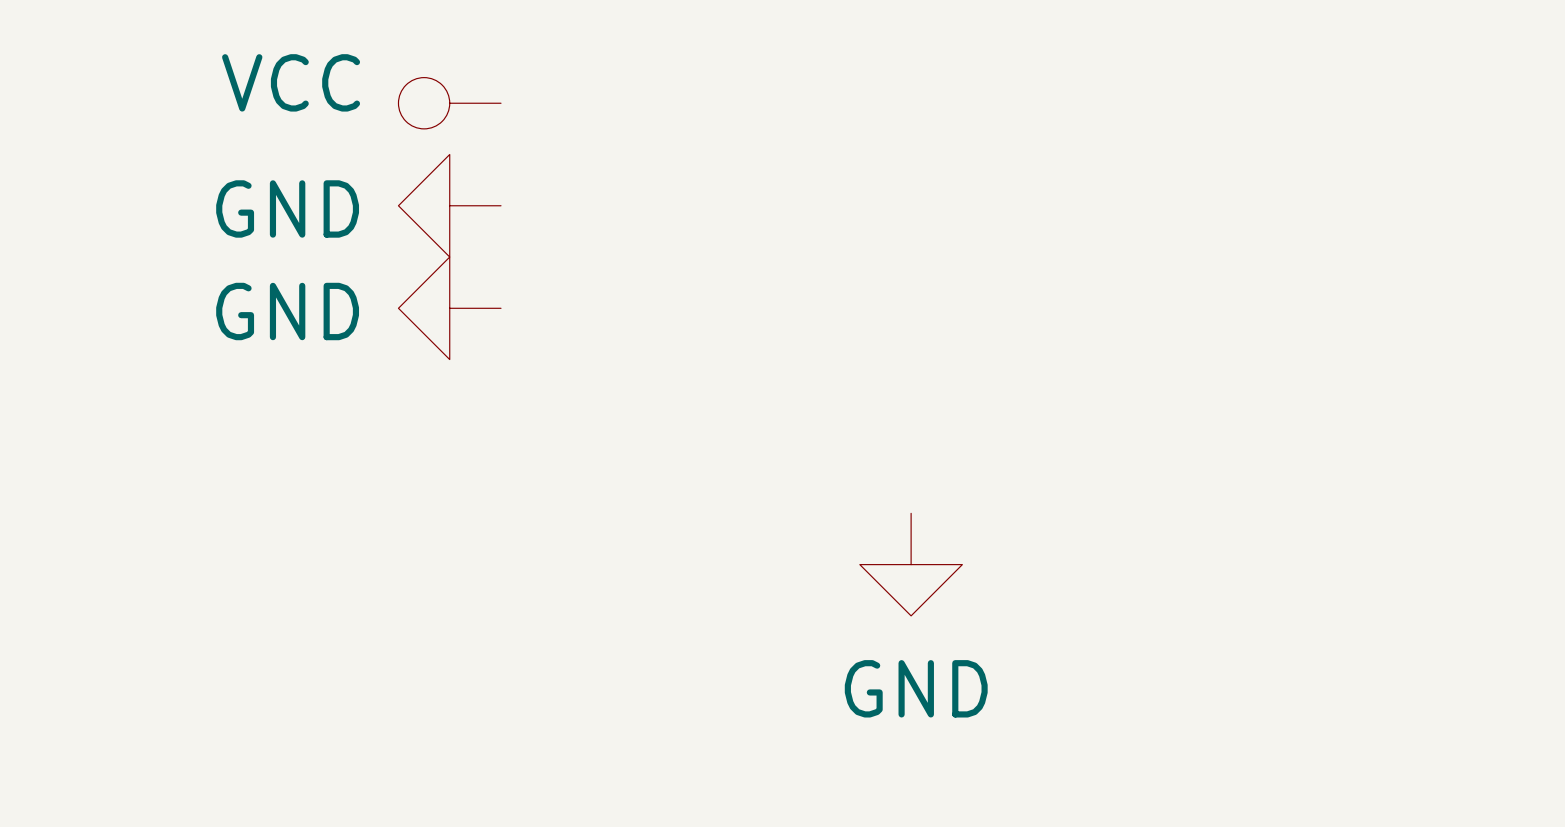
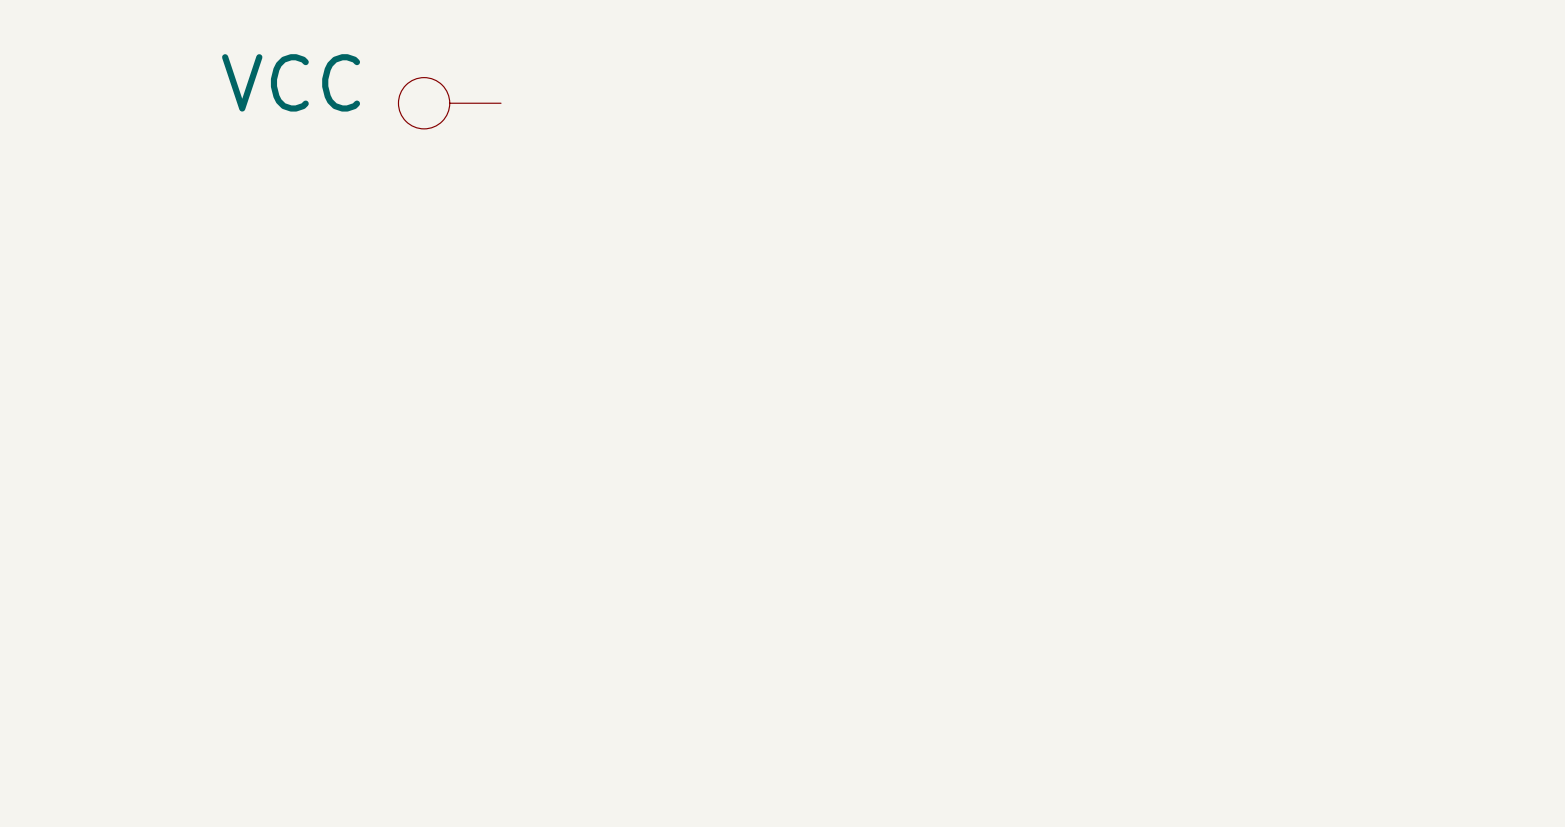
power symbol: GND (449, 205) -> none
power symbol: GND (449, 308) -> none
power symbol: GND (911, 564) -> none

